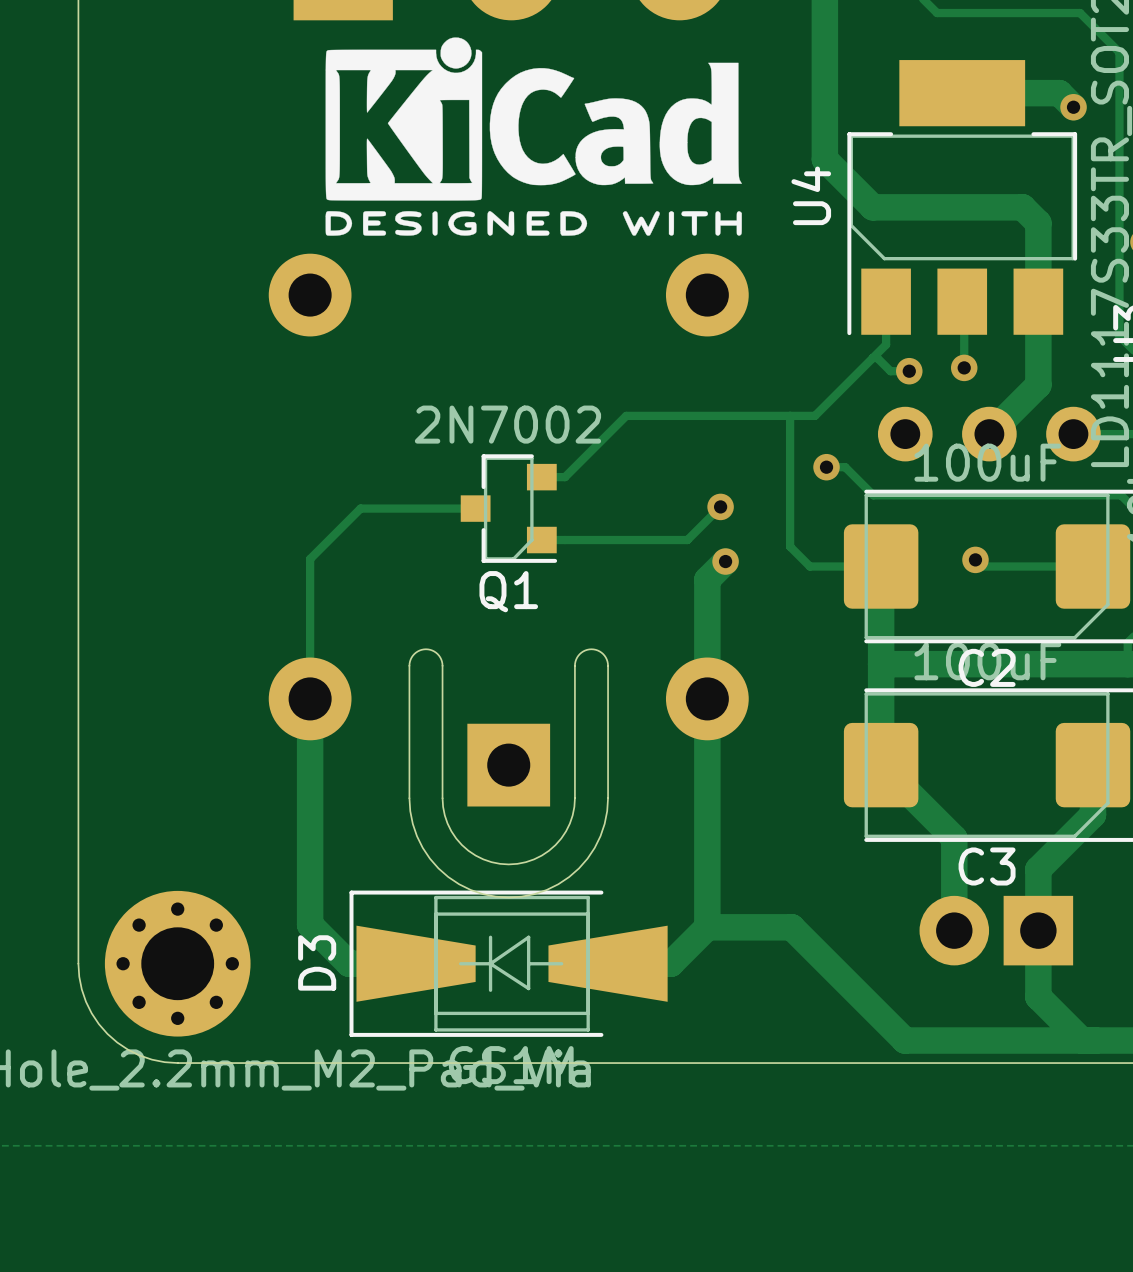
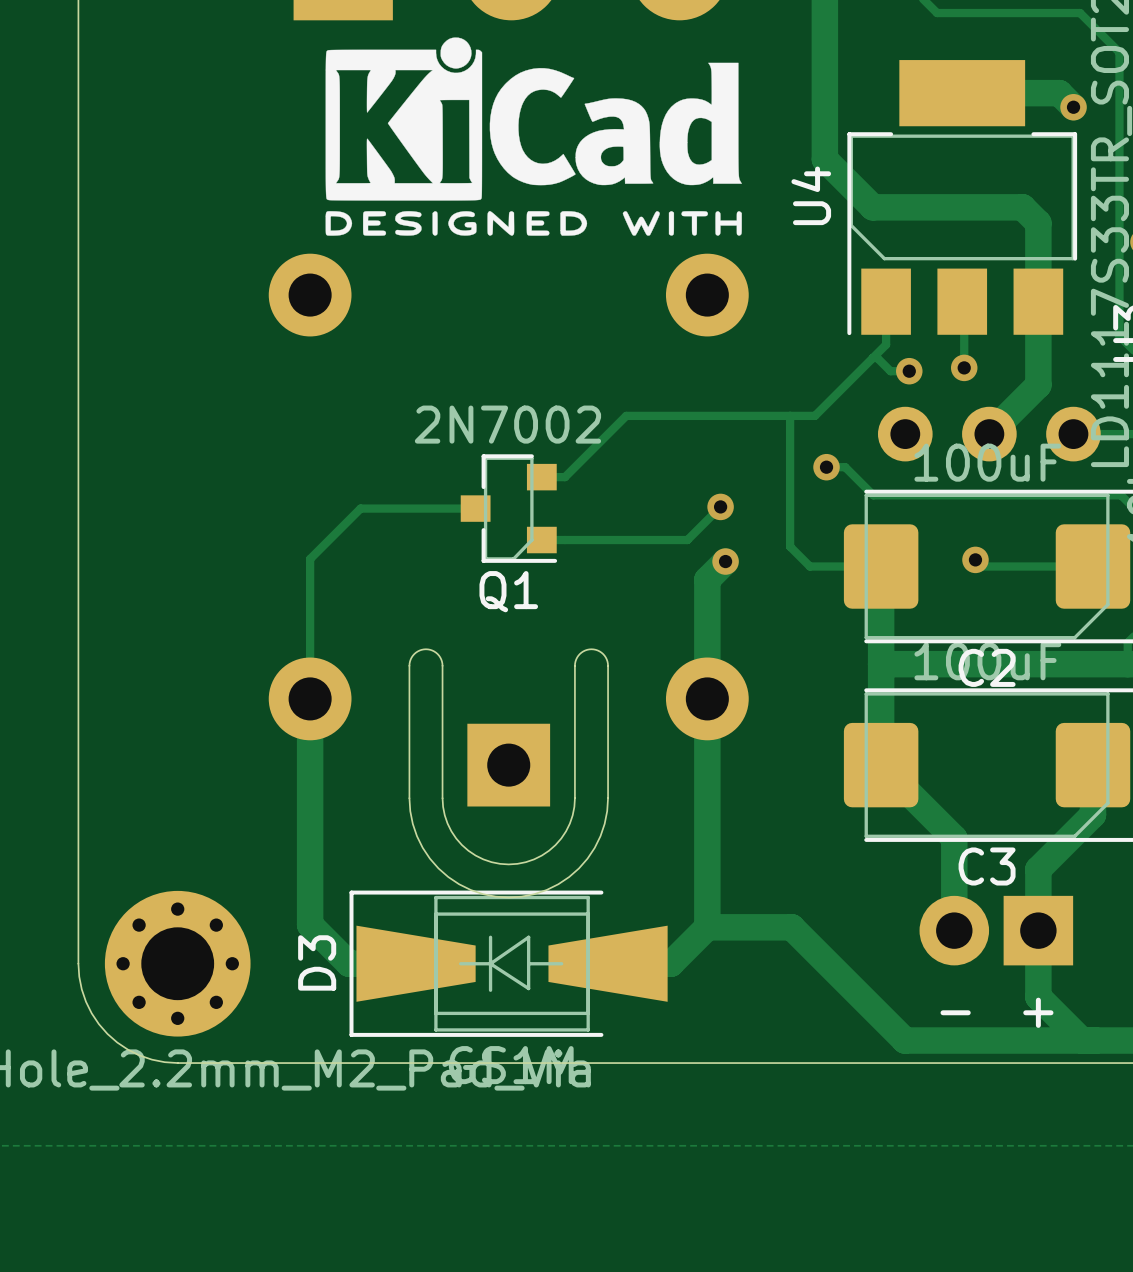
text: none -> - (955, 1012)
text: none -> + (1038, 1012)

